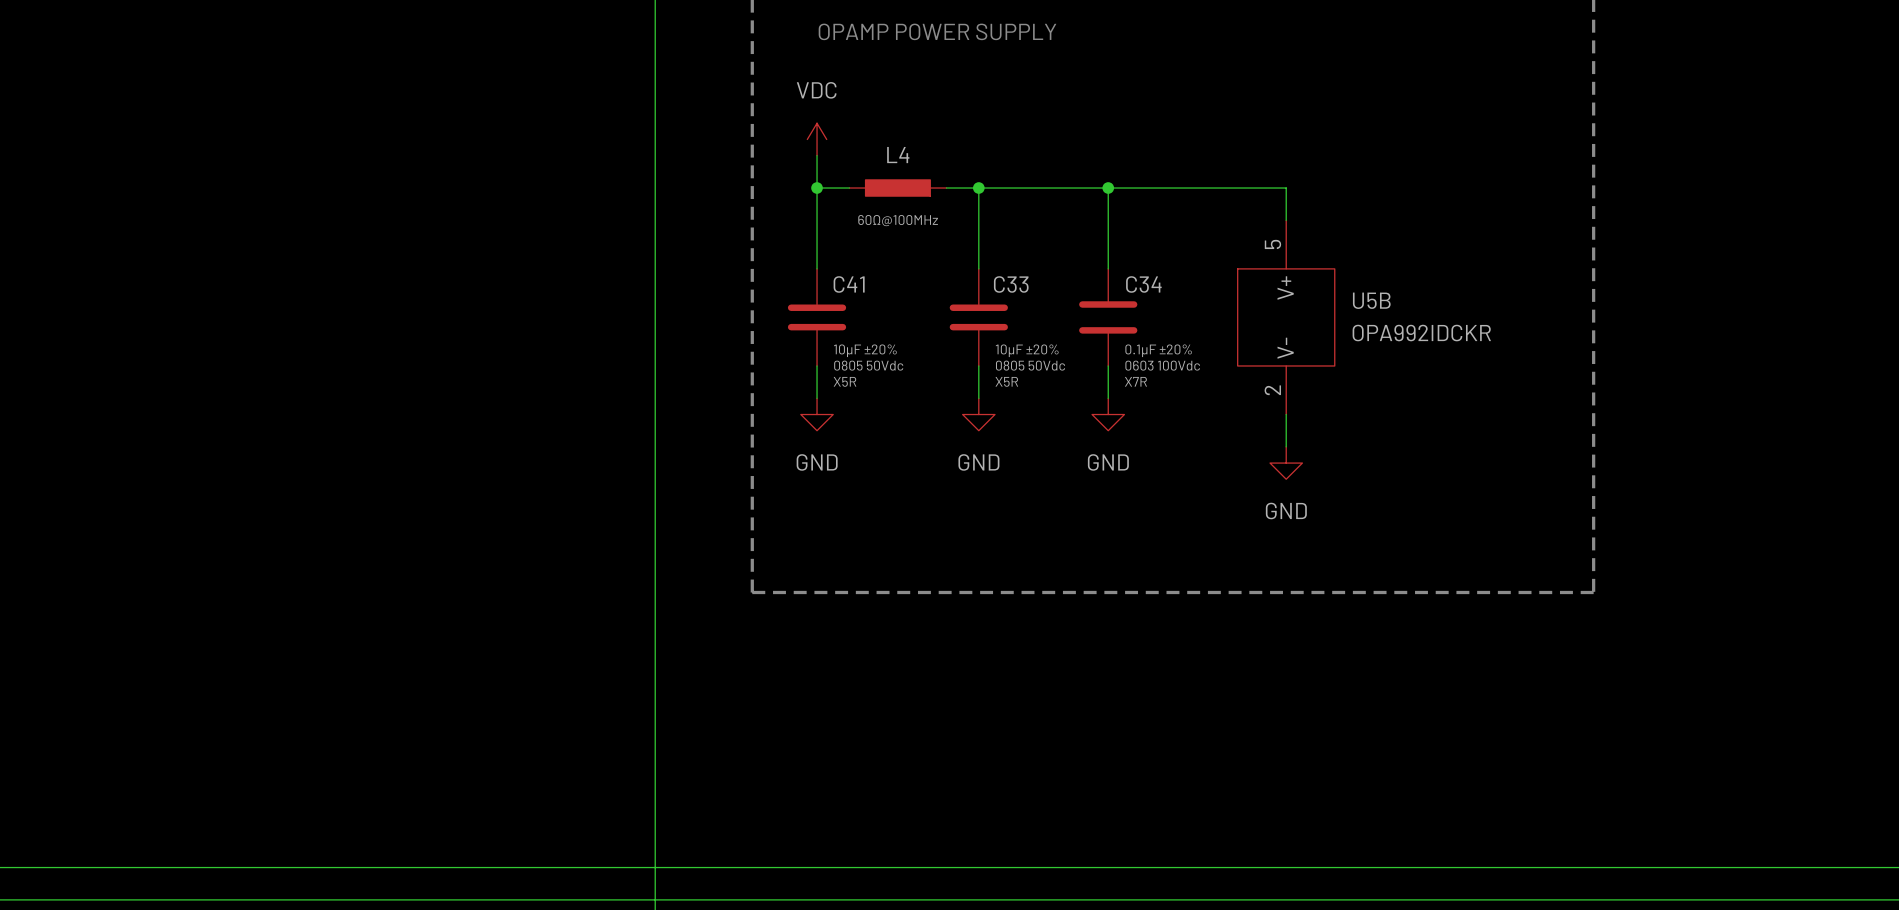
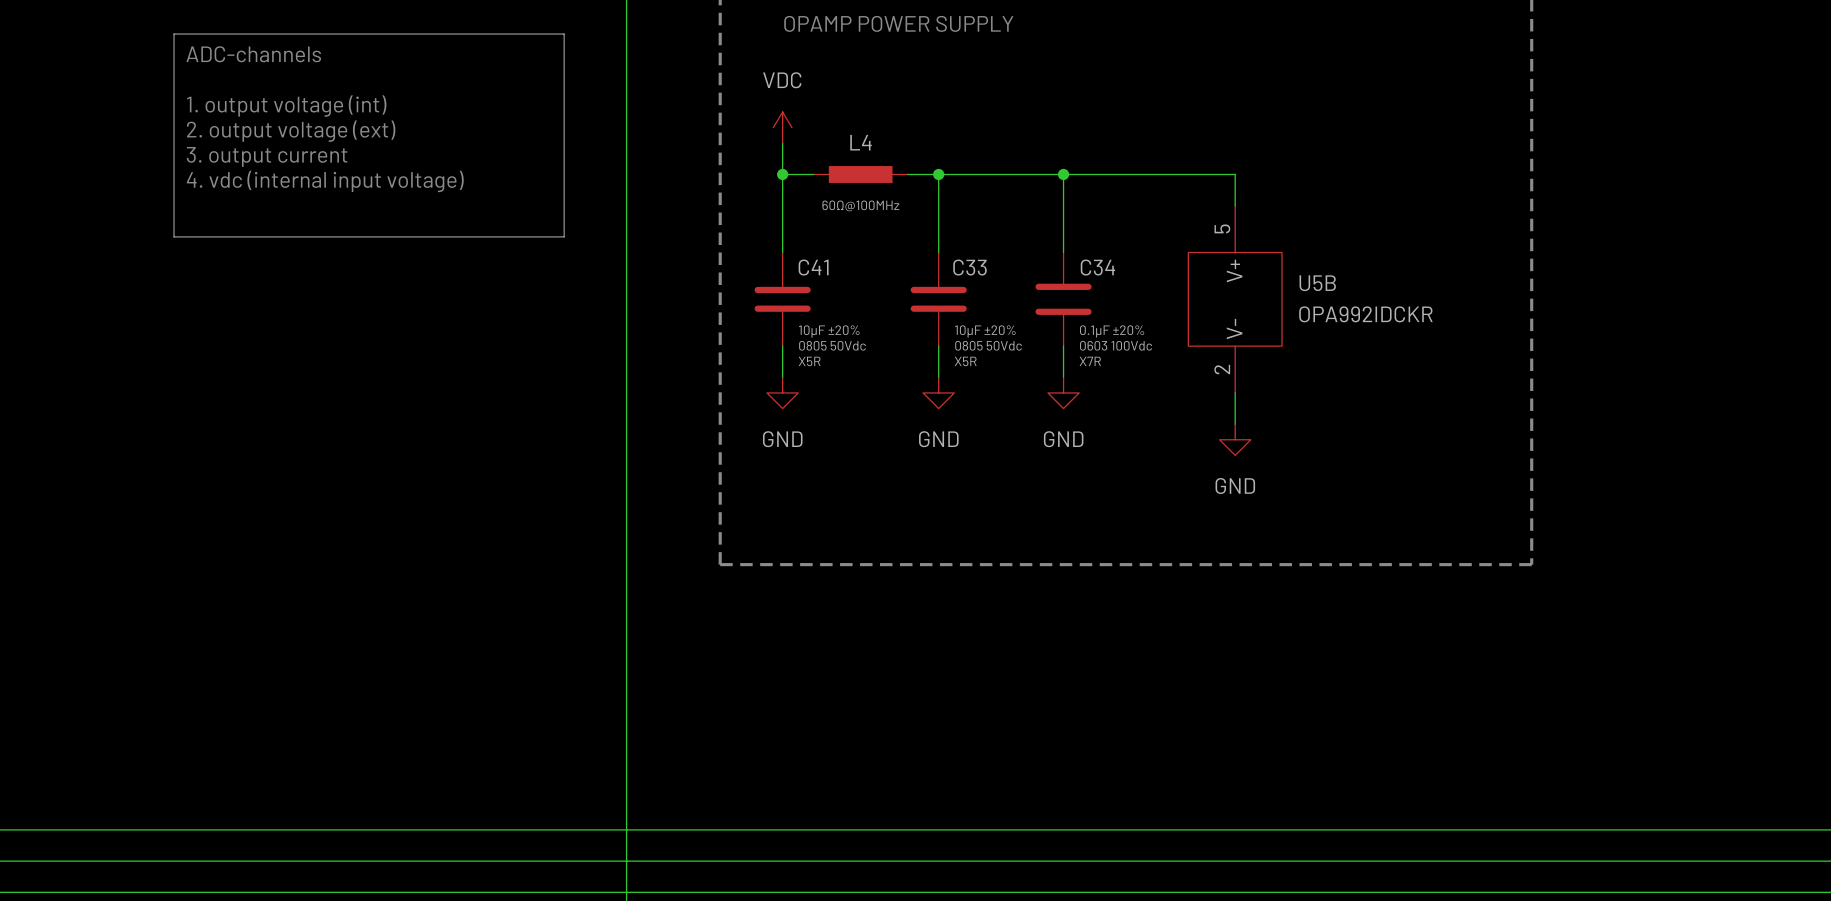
line: none -> (174, 34) (564, 34) (564, 236) (174, 236) (174, 34)
text: none -> ADC-channels (253, 54)
text: none -> 1. output voltage (int) (286, 106)
text: none -> 2. output voltage (ext) (291, 131)
text: none -> 3. output current (267, 156)
text: none -> 4. vdc (internal input voltage) (325, 181)

